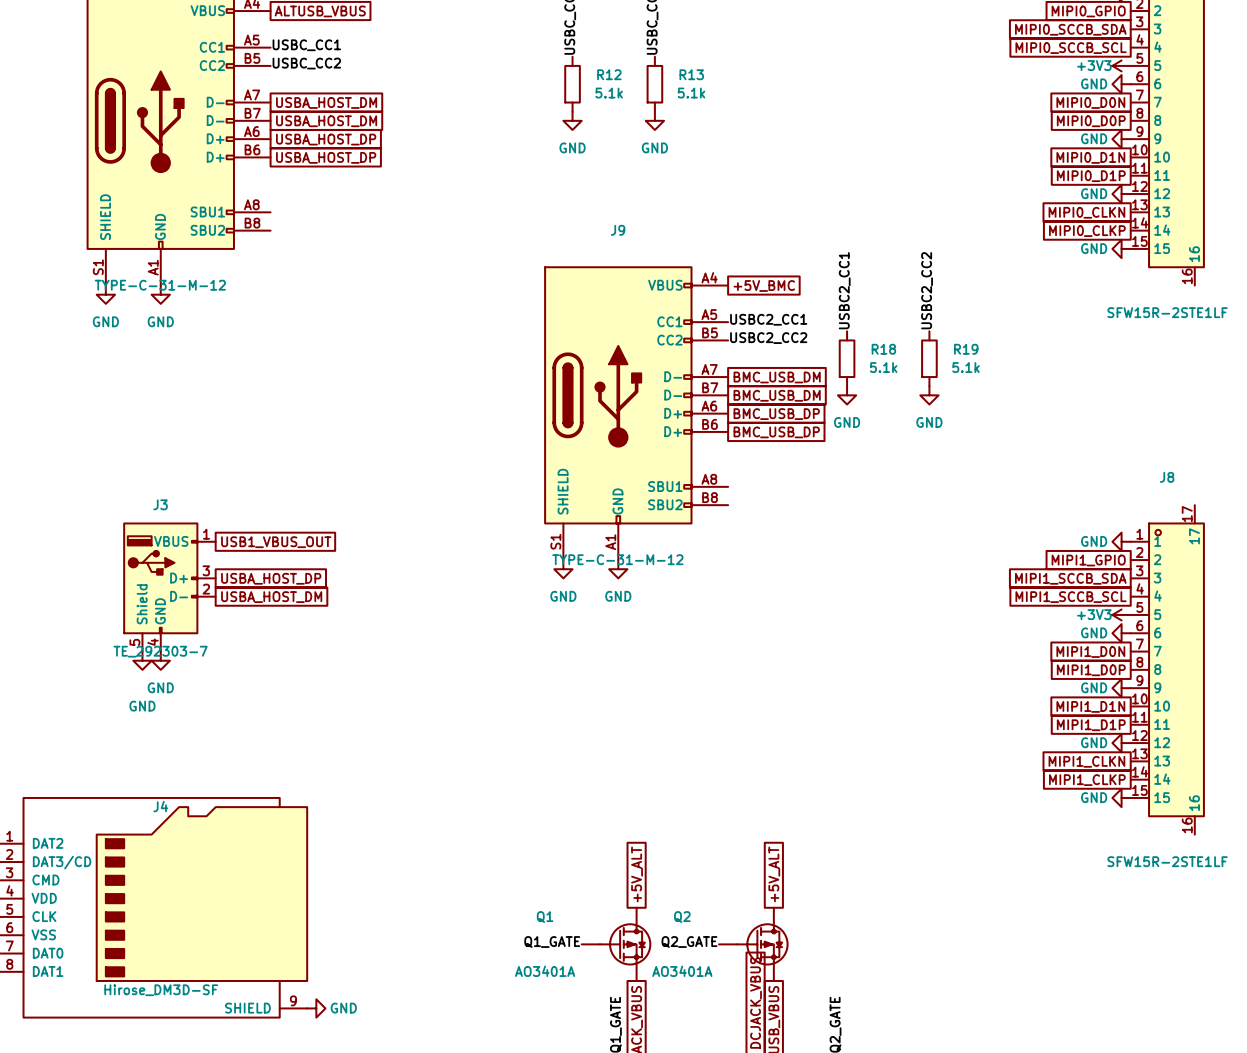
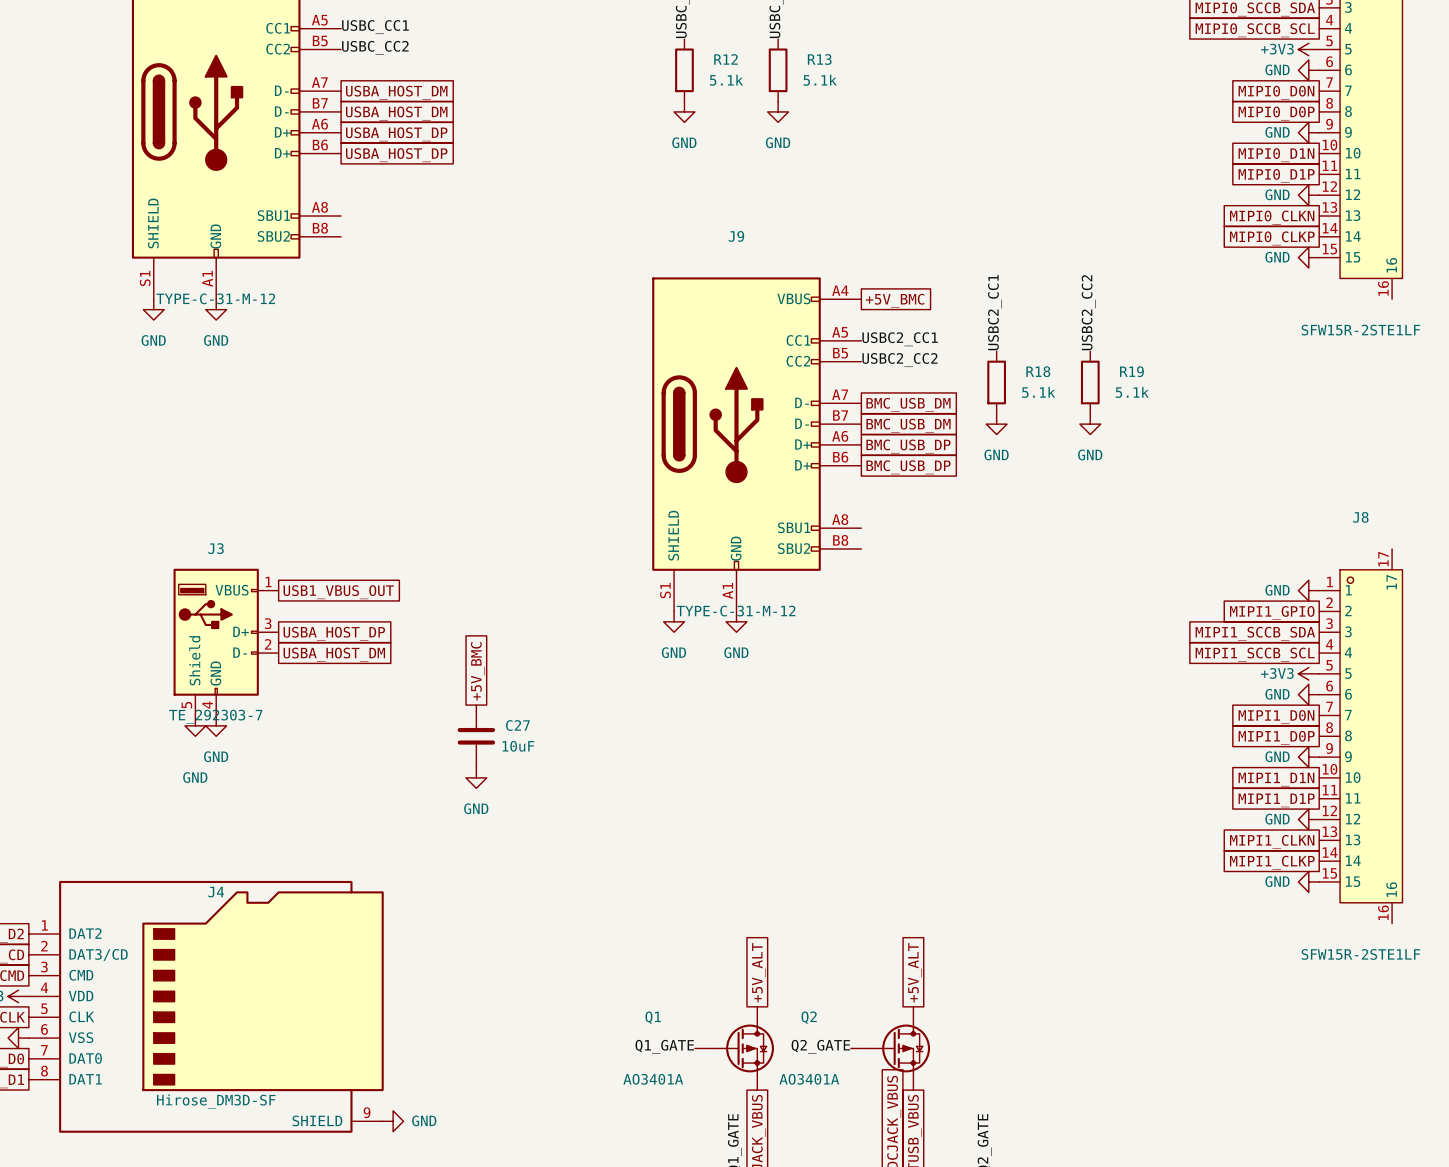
global label: none -> +5V_BMC (477, 671)
C27: none -> 10uF (476, 736)
power symbol: none -> GND (476, 777)

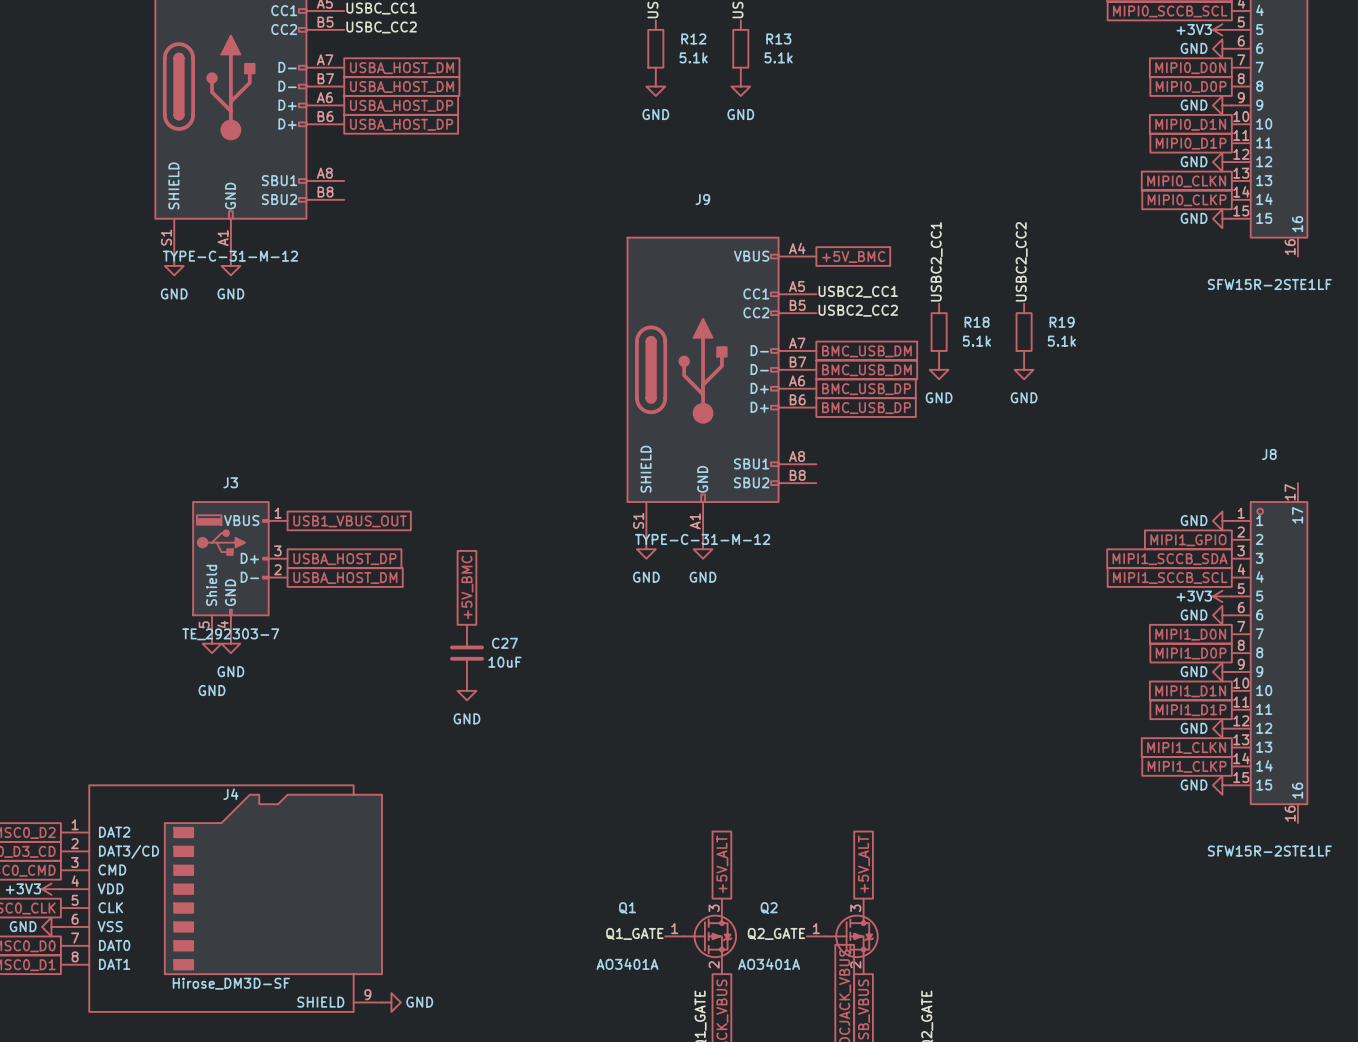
Q1 symbol: [694, 1006, 774, 1091] -> [665, 898, 738, 975]
Q2 symbol: [850, 1006, 931, 1091] -> [806, 898, 879, 975]

